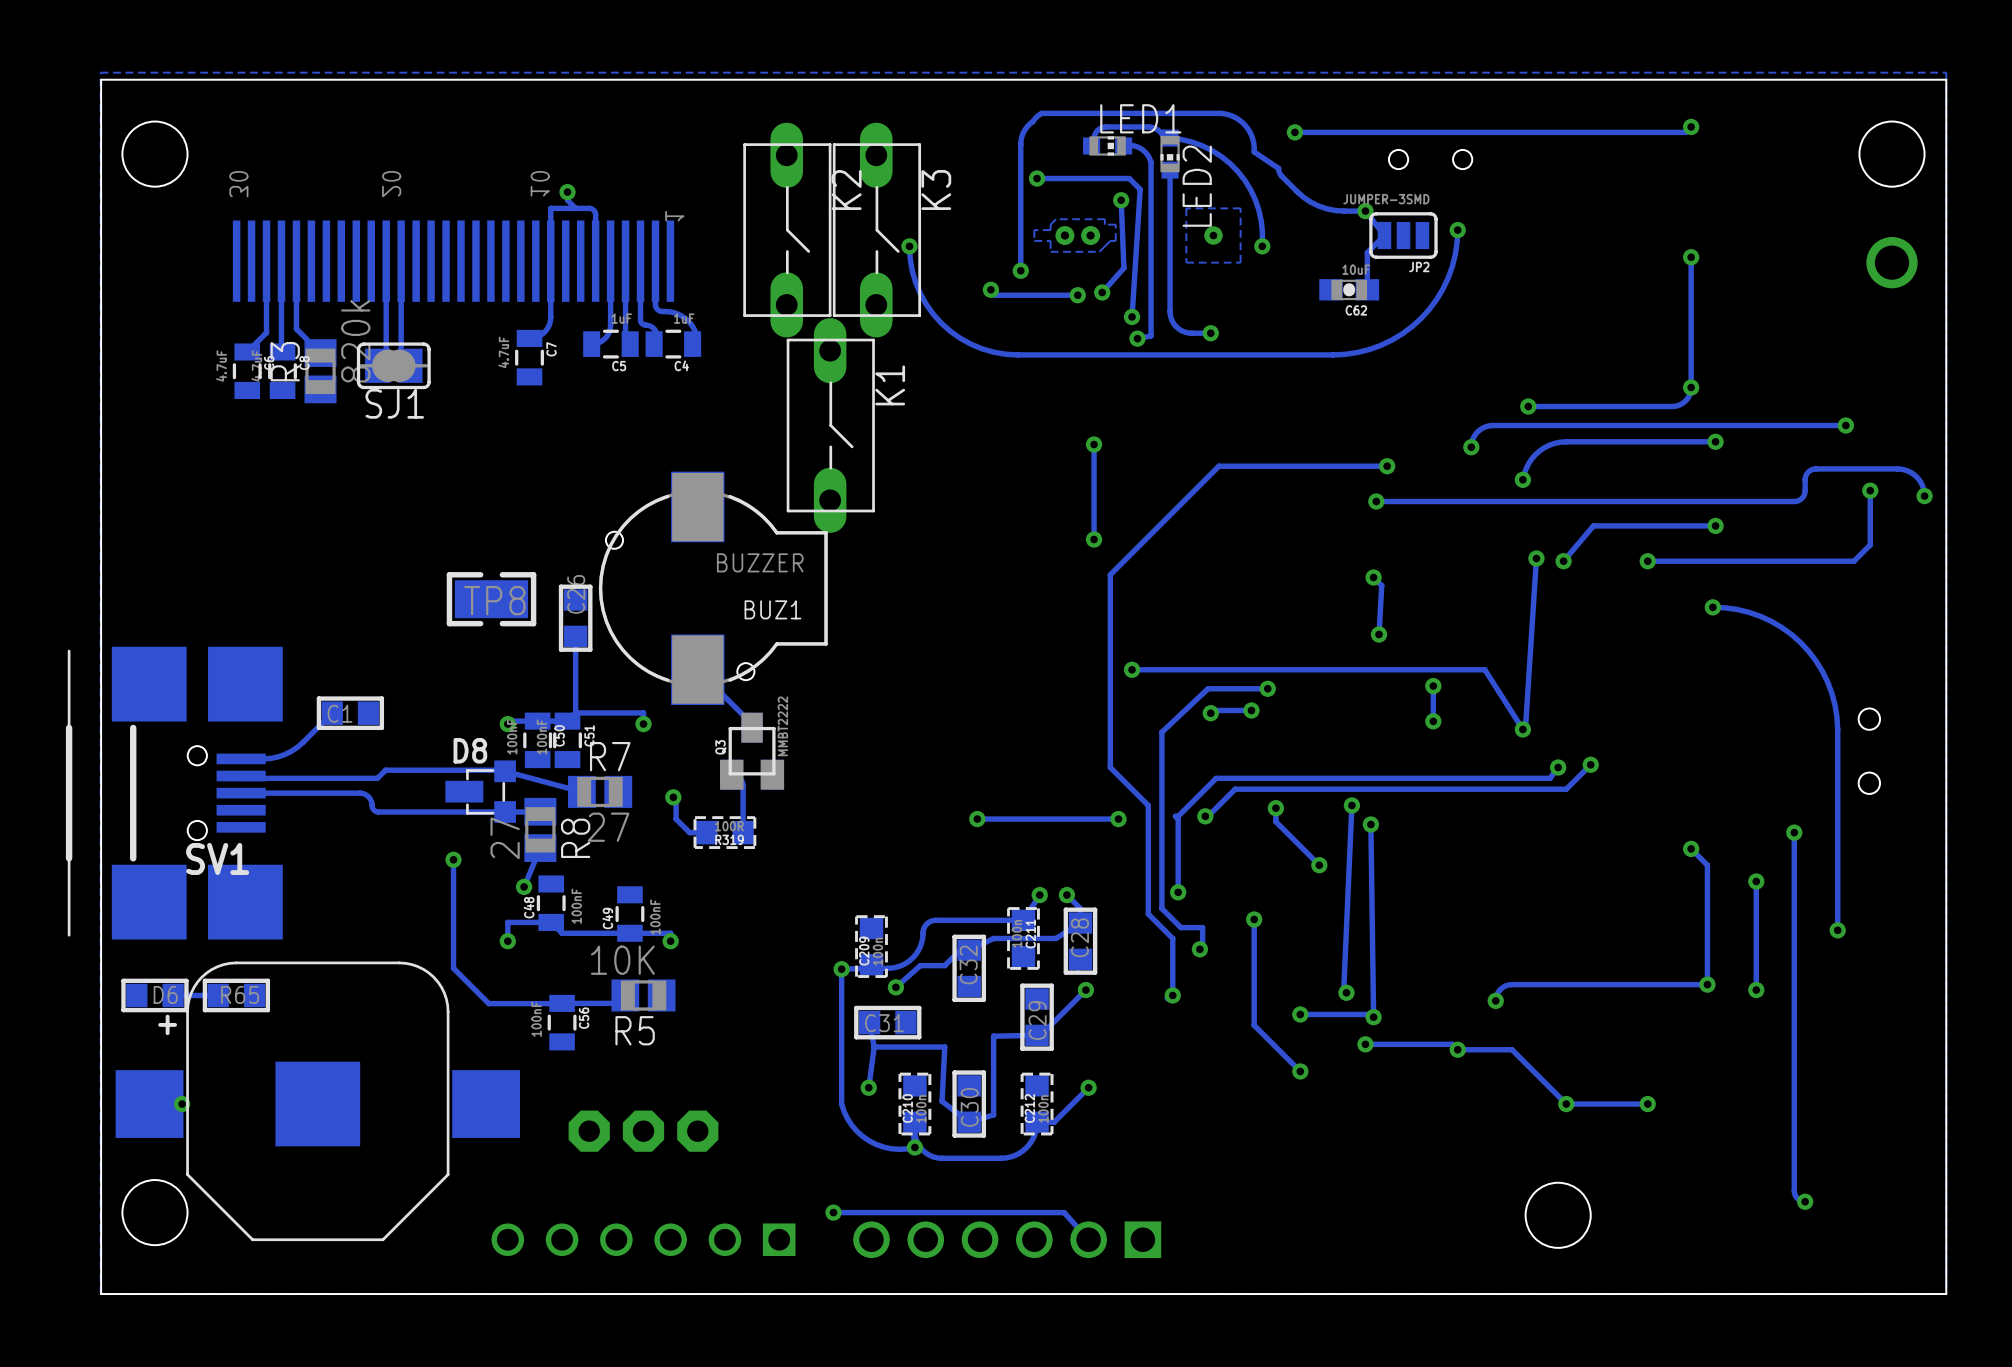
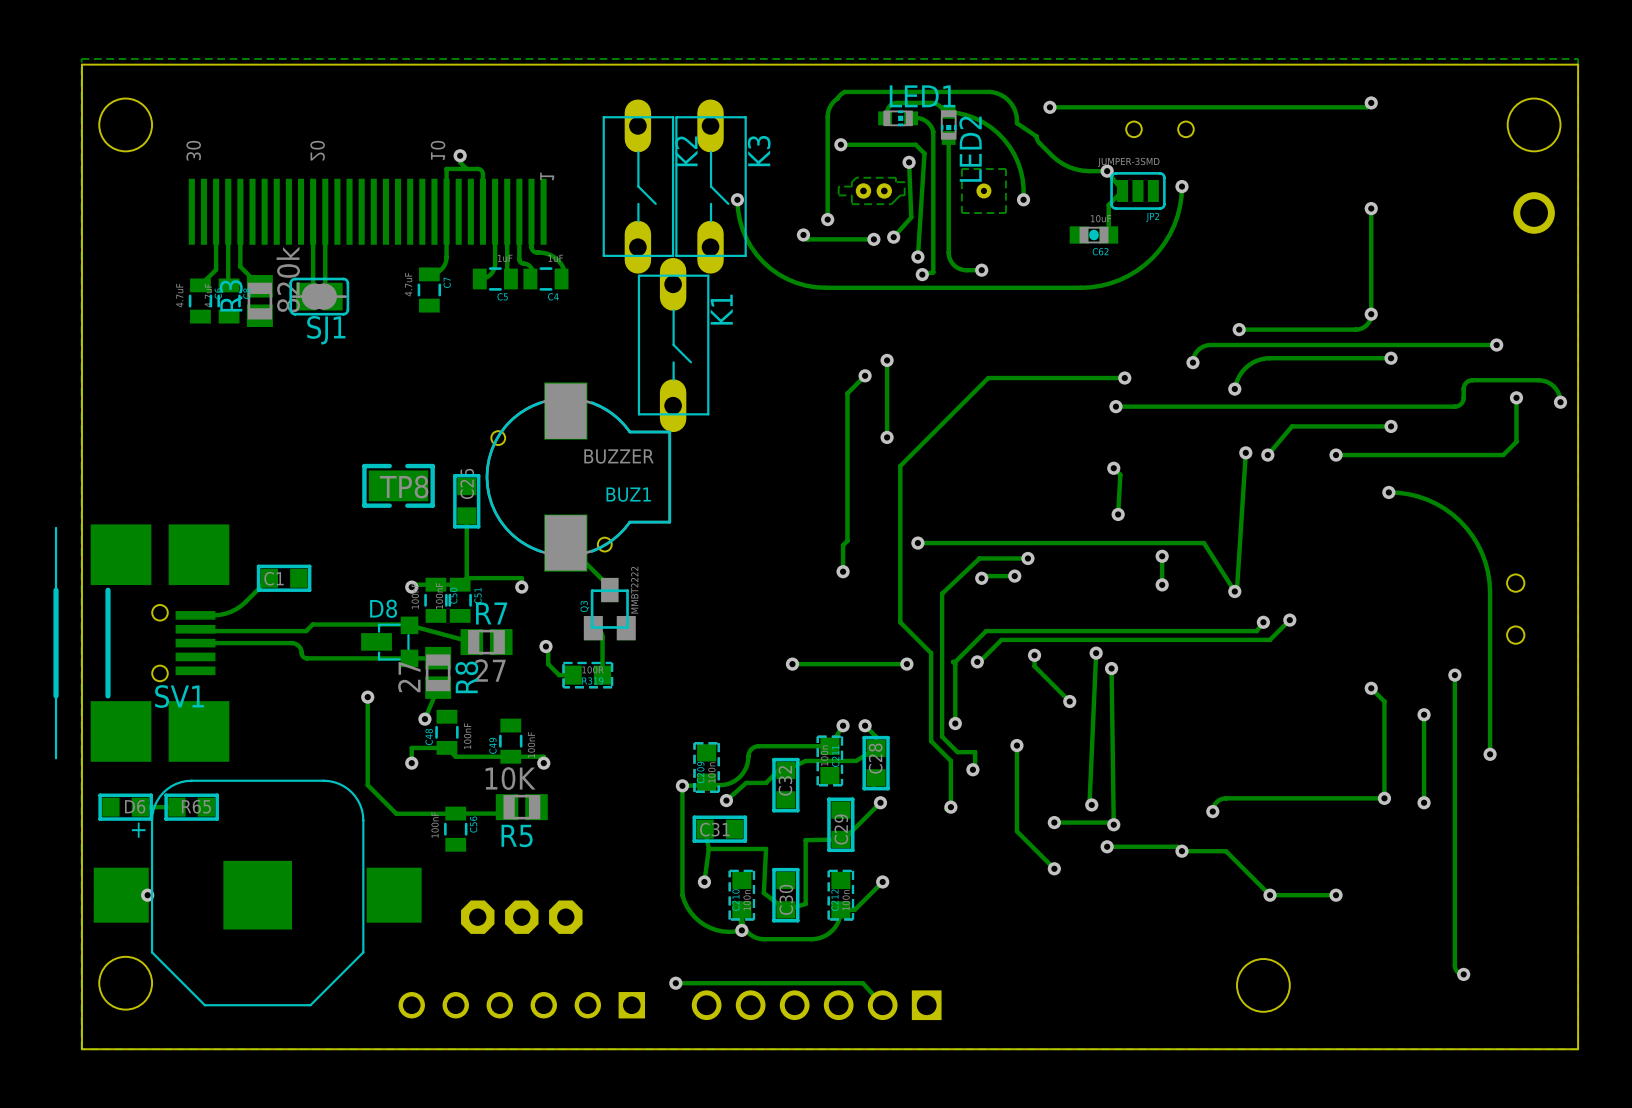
track: none -> (865, 375) (847, 393) (847, 540) (843, 545) (843, 571)
via: none -> (865, 375)
via: none -> (843, 571)

